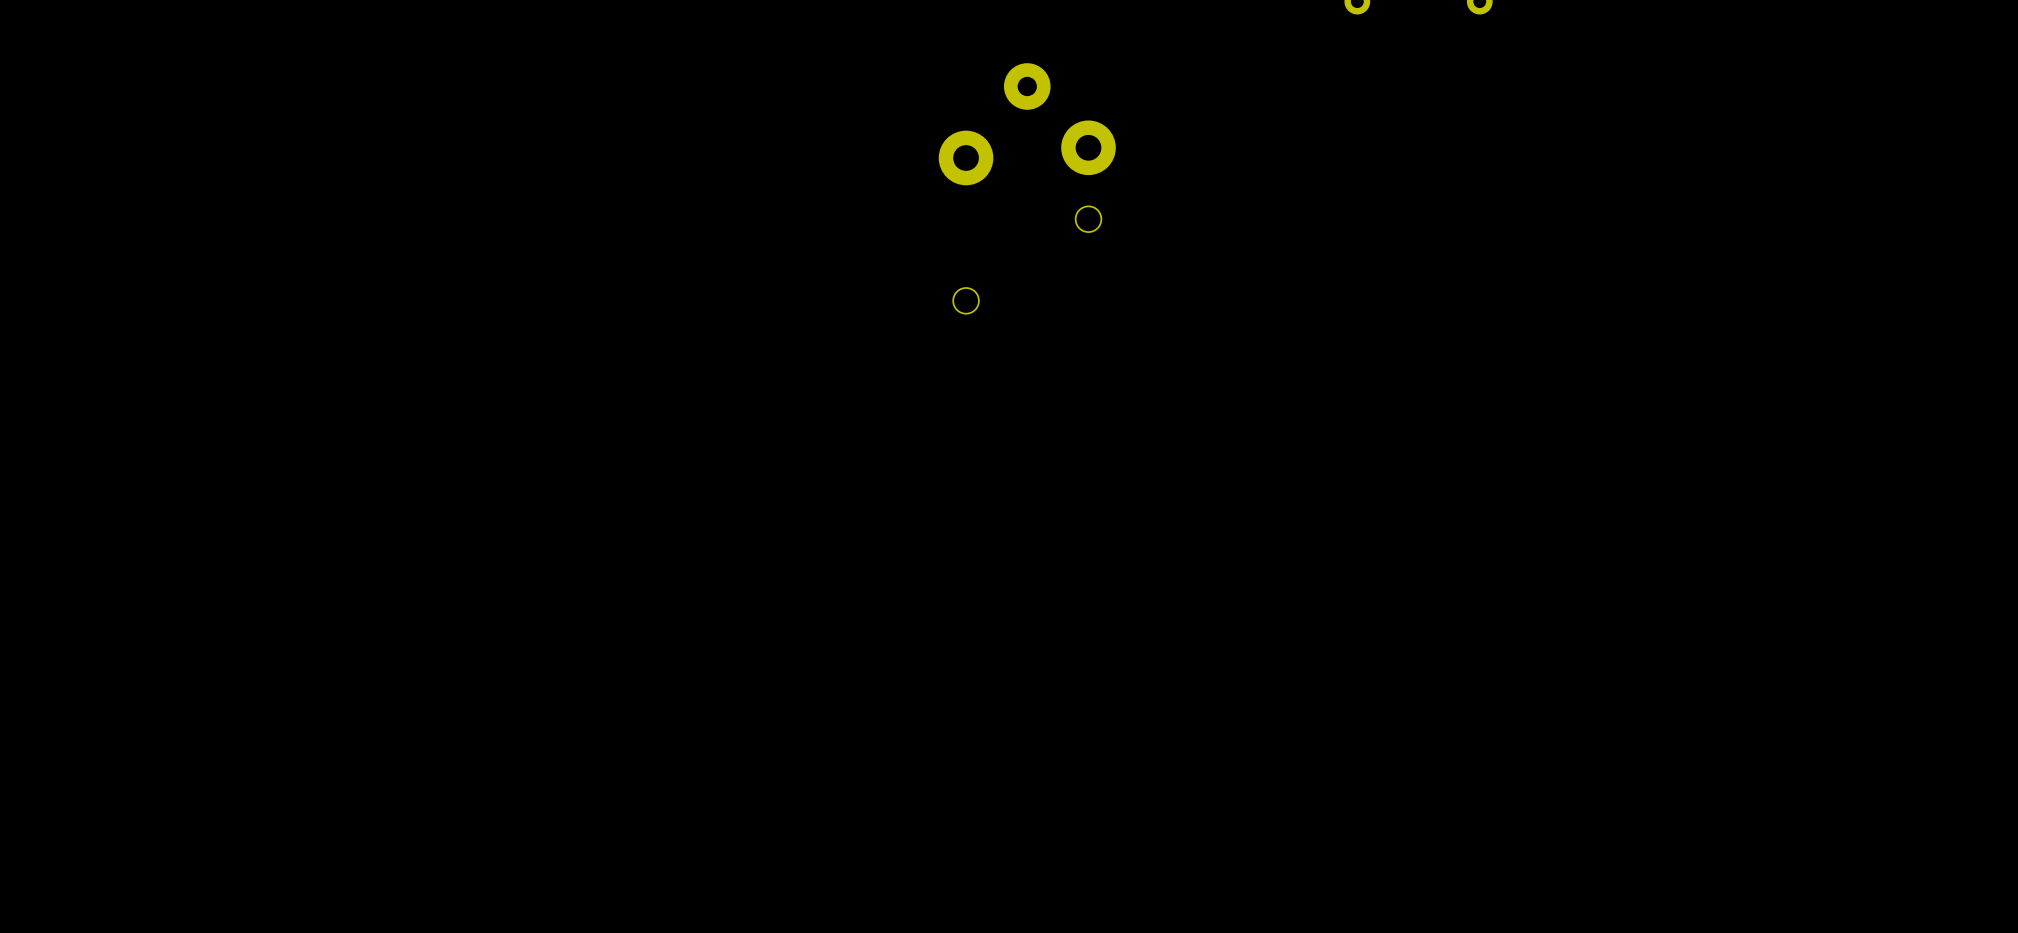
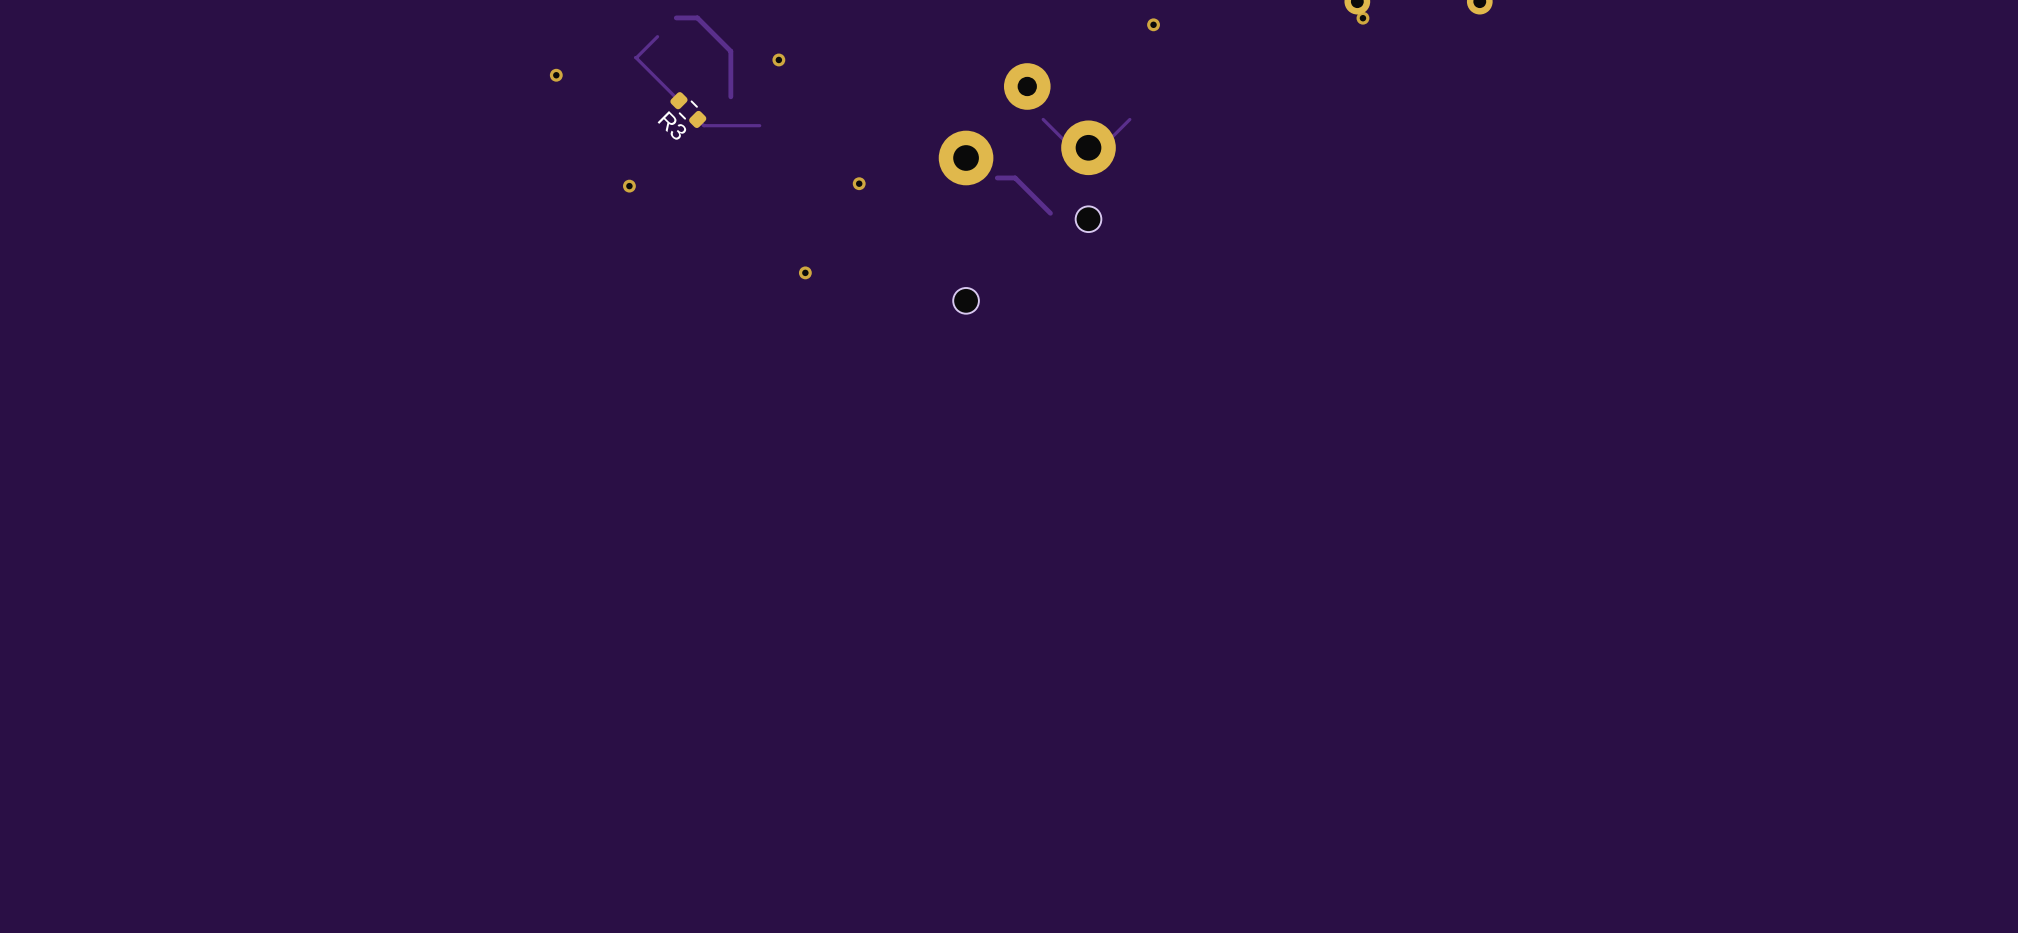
track: none -> (676, 17) (697, 17) (730, 51) (730, 96)
via: none -> (1362, 18)
via: none -> (1153, 24)
track: none -> (657, 36) (635, 57) (678, 100)
via: none -> (778, 59)
via: none -> (556, 75)
R3: none -> (688, 110)
track: none -> (697, 119) (703, 125) (759, 125)
track: none -> (1043, 119) (1071, 147) (1071, 162)
track: none -> (1129, 119) (1097, 151) (1097, 162)
track: none -> (997, 177) (1015, 177) (1050, 213)
via: none -> (859, 183)
via: none -> (629, 186)
via: none -> (805, 272)

